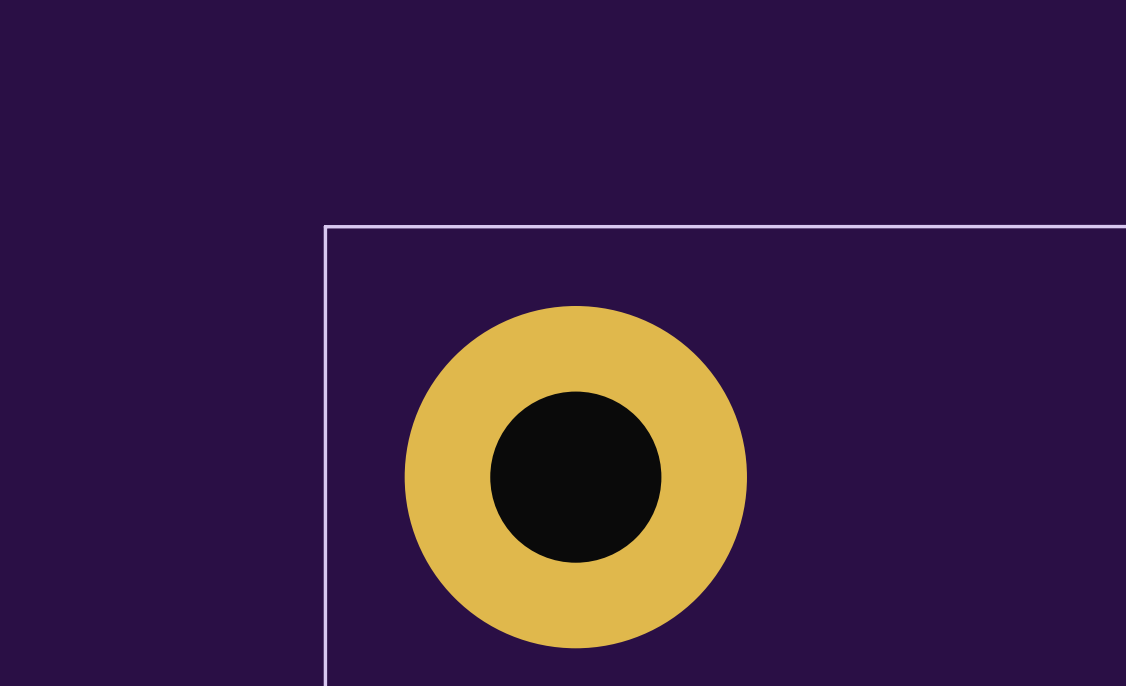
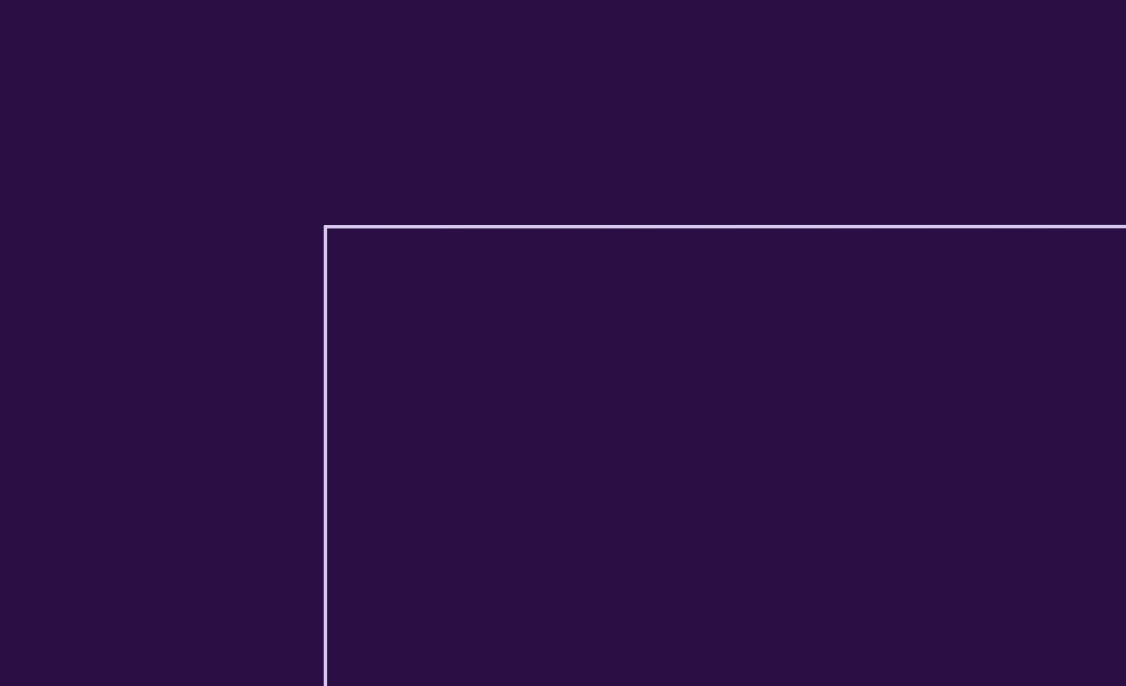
part: (575, 477) -> none

